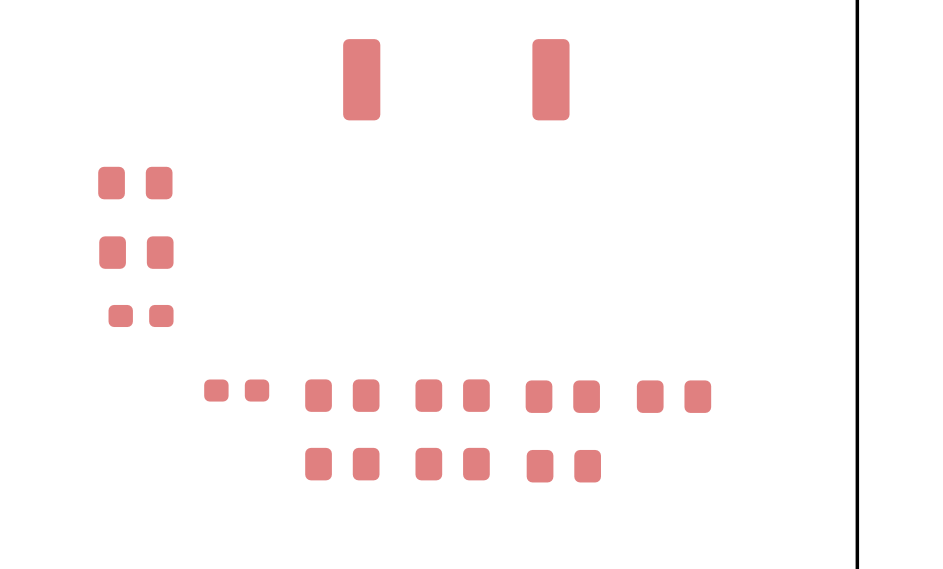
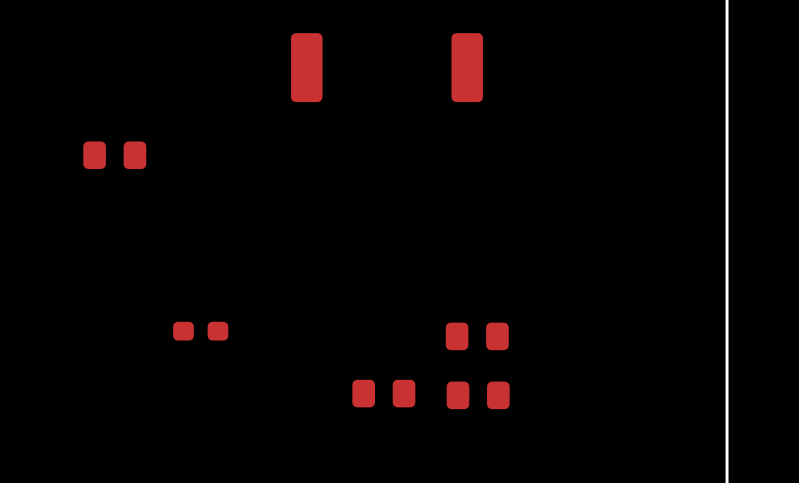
part: (136, 252) -> none
part: (141, 315) -> none
part: (342, 395) -> none
part: (452, 395) -> none
part: (674, 396) -> none
part: (342, 464) -> none

